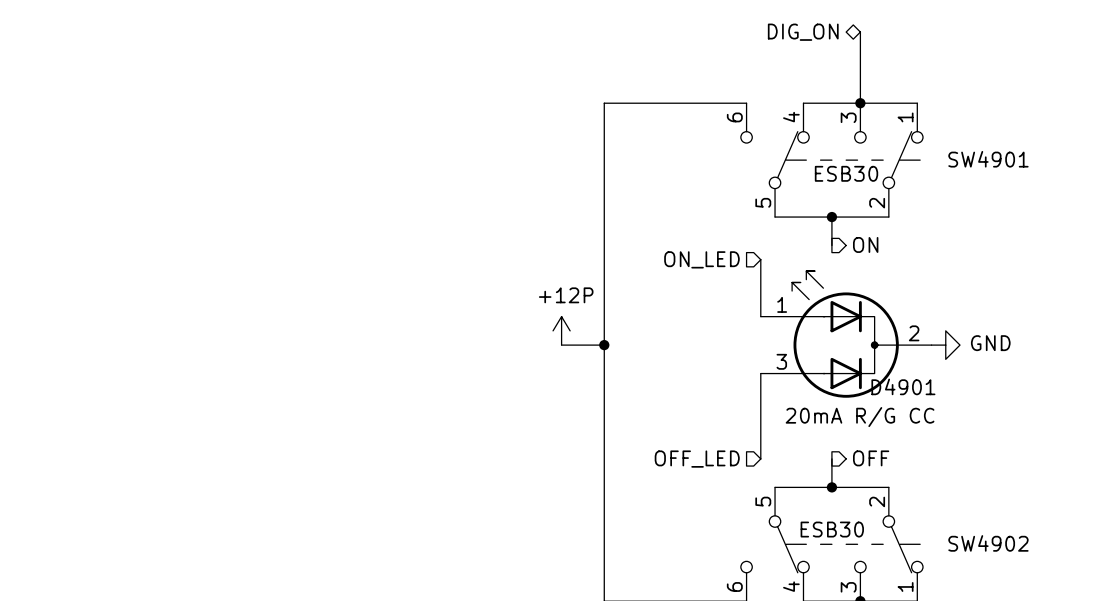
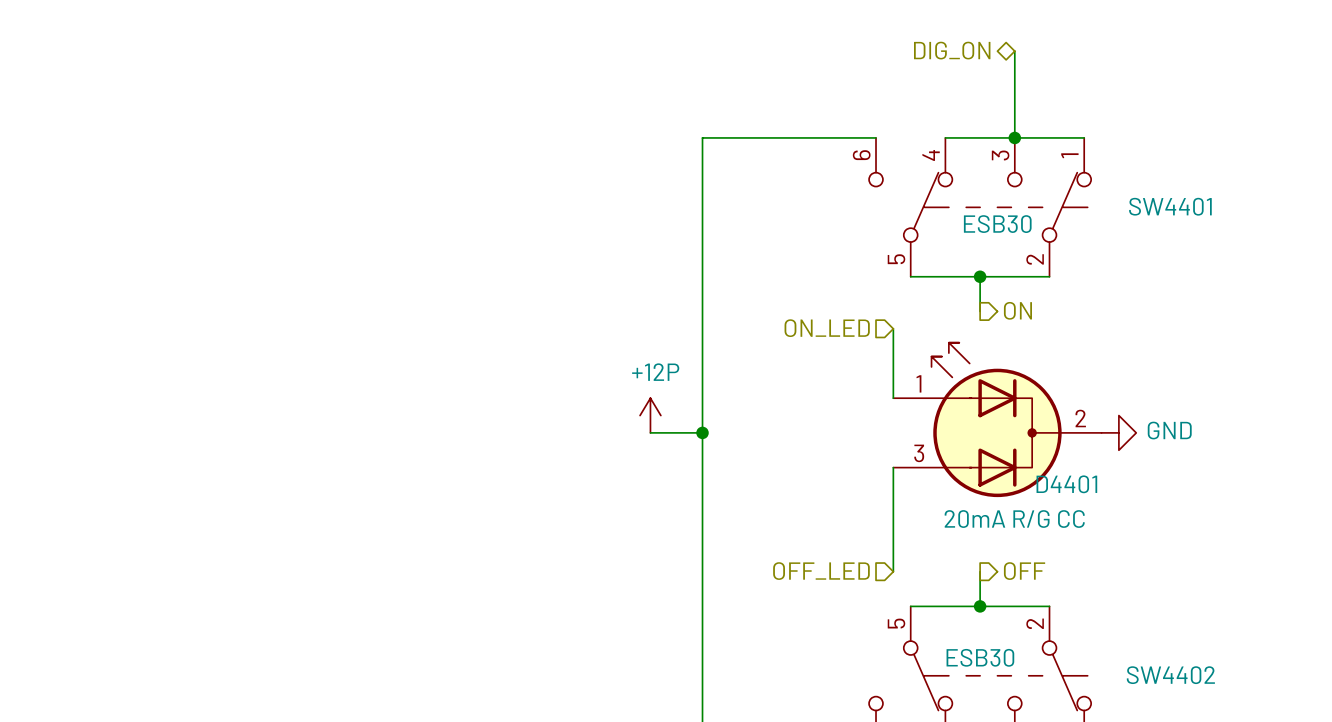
SW4901 name: SW4901 (988, 159) -> SW4401 (1170, 206)
D4901 name: D4901 (903, 386) -> D4401 (1066, 484)
SW4902 name: SW4902 (988, 543) -> SW4402 (1170, 675)

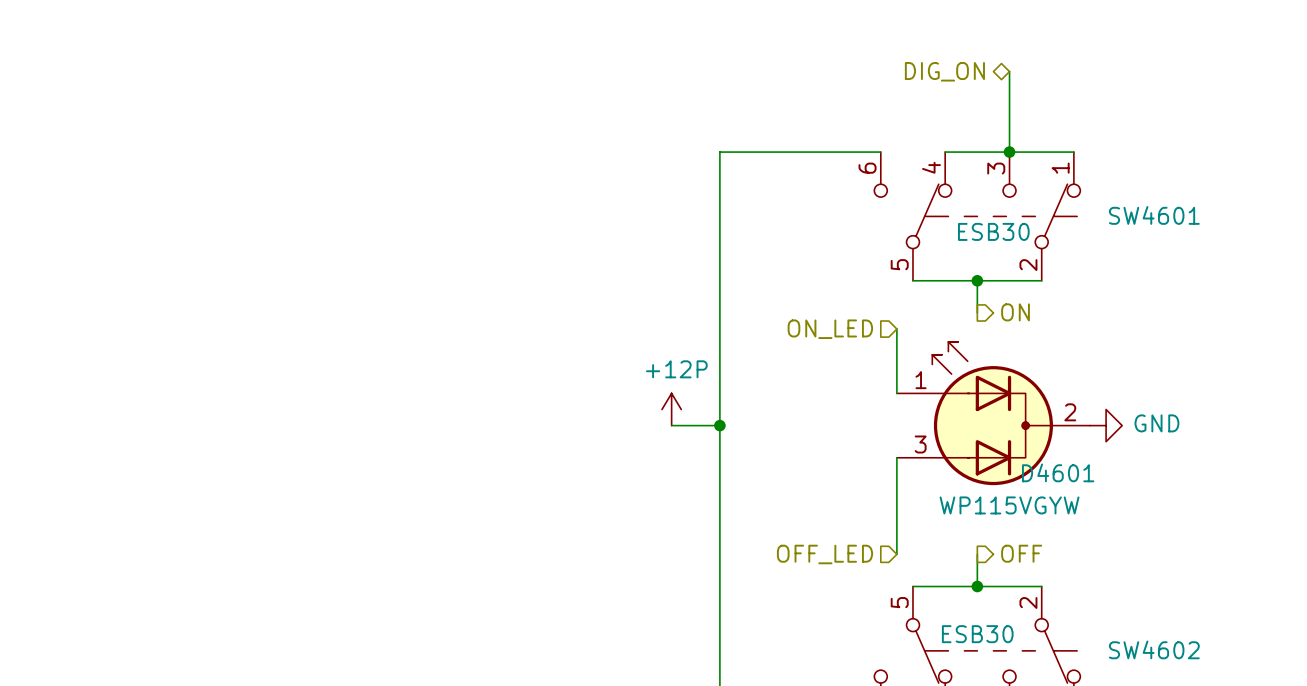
SW4401 name: SW4401 (1170, 206) -> SW4601 (1154, 215)
D4401 name: D4401 (1066, 484) -> D4601 (1058, 472)
D4401 value: 20mA R/G CC (1014, 519) -> WP115VGYW (1009, 505)
SW4402 name: SW4402 (1170, 675) -> SW4602 (1154, 649)

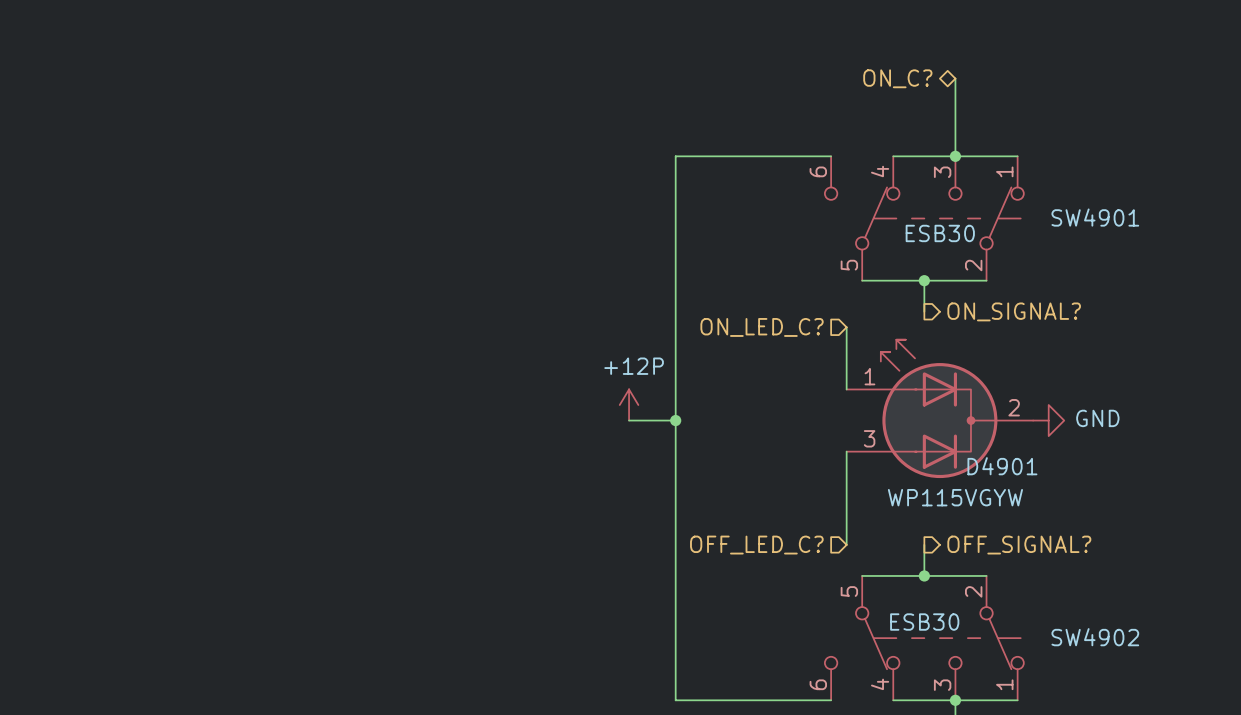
hierarchical label: DIG_ON (944, 71) -> ON_C? (897, 78)
SW4601 name: SW4601 (1154, 215) -> SW4901 (1095, 217)
hierarchical label: ON (1015, 312) -> ON_SIGNAL? (1014, 311)
hierarchical label: ON_LED (830, 329) -> ON_LED_C? (762, 327)
D4601 name: D4601 (1058, 472) -> D4901 (1002, 466)
hierarchical label: OFF (1021, 553) -> OFF_SIGNAL? (1019, 545)
hierarchical label: OFF_LED (825, 554) -> OFF_LED_C? (756, 545)
SW4602 name: SW4602 (1154, 649) -> SW4902 (1095, 637)

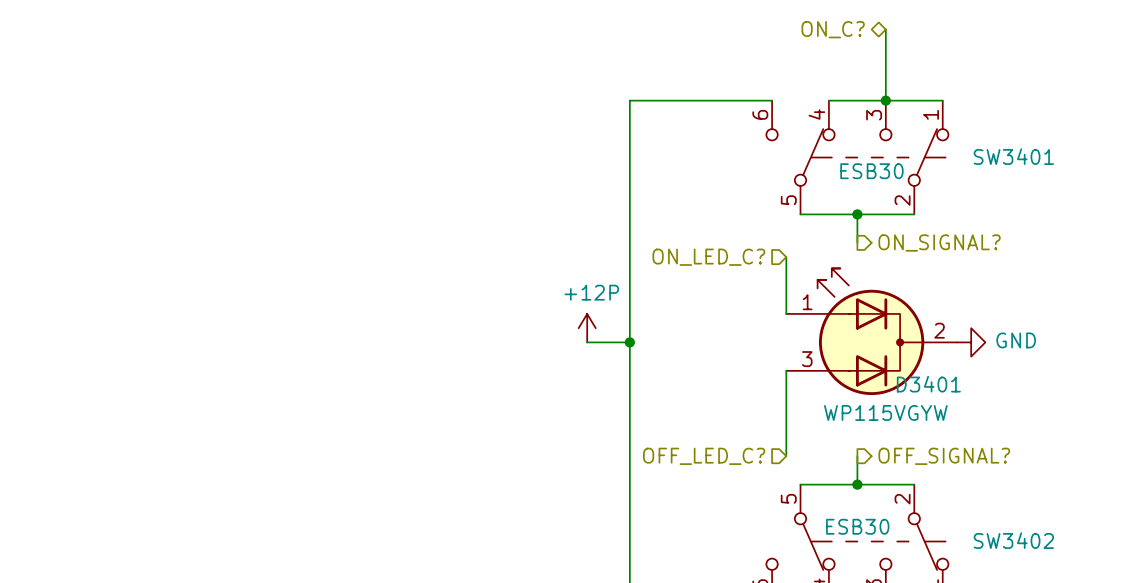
SW4901 name: SW4901 (1095, 217) -> SW3401 (1013, 156)
D4901 name: D4901 (1002, 466) -> D3401 (928, 384)
SW4902 name: SW4902 (1095, 637) -> SW3402 (1013, 540)

